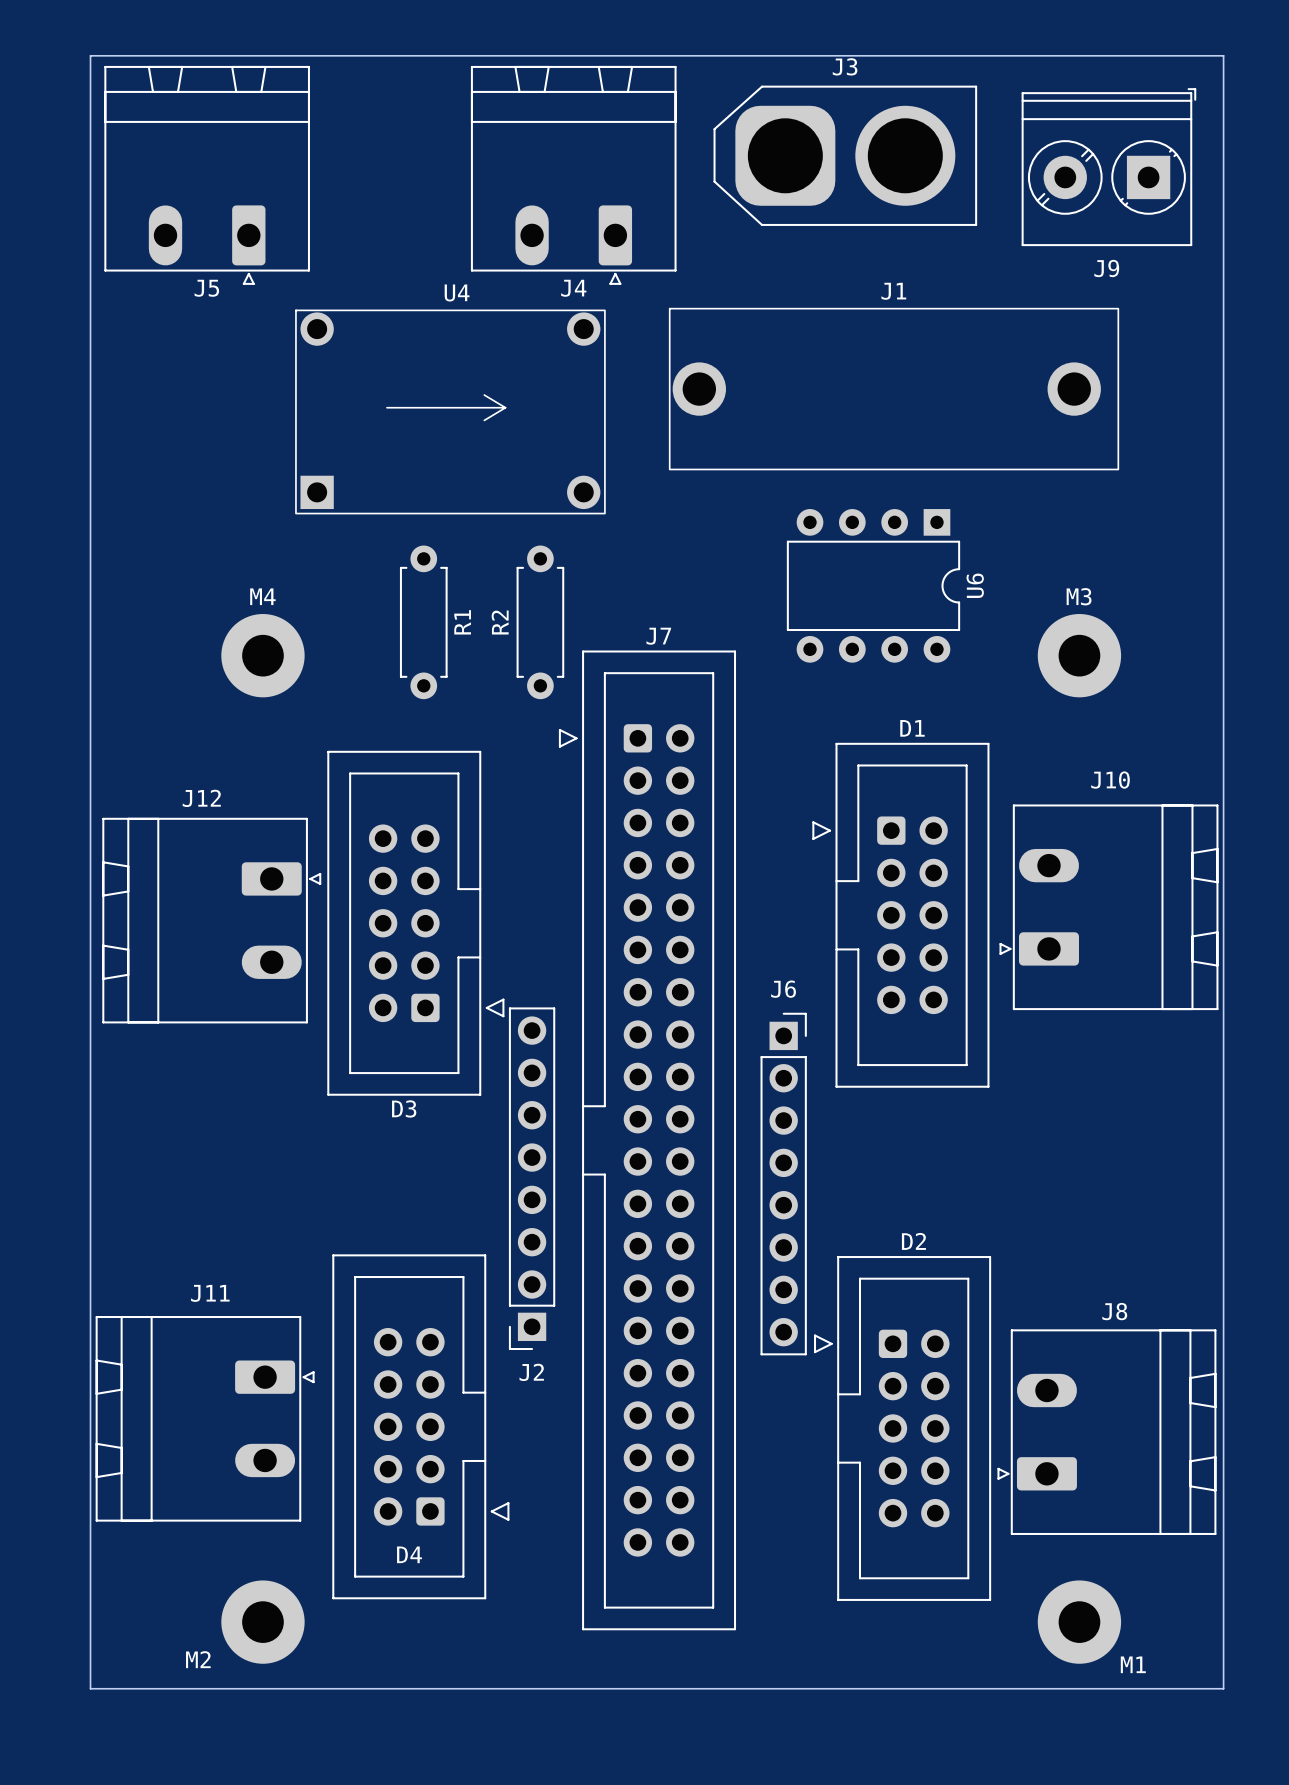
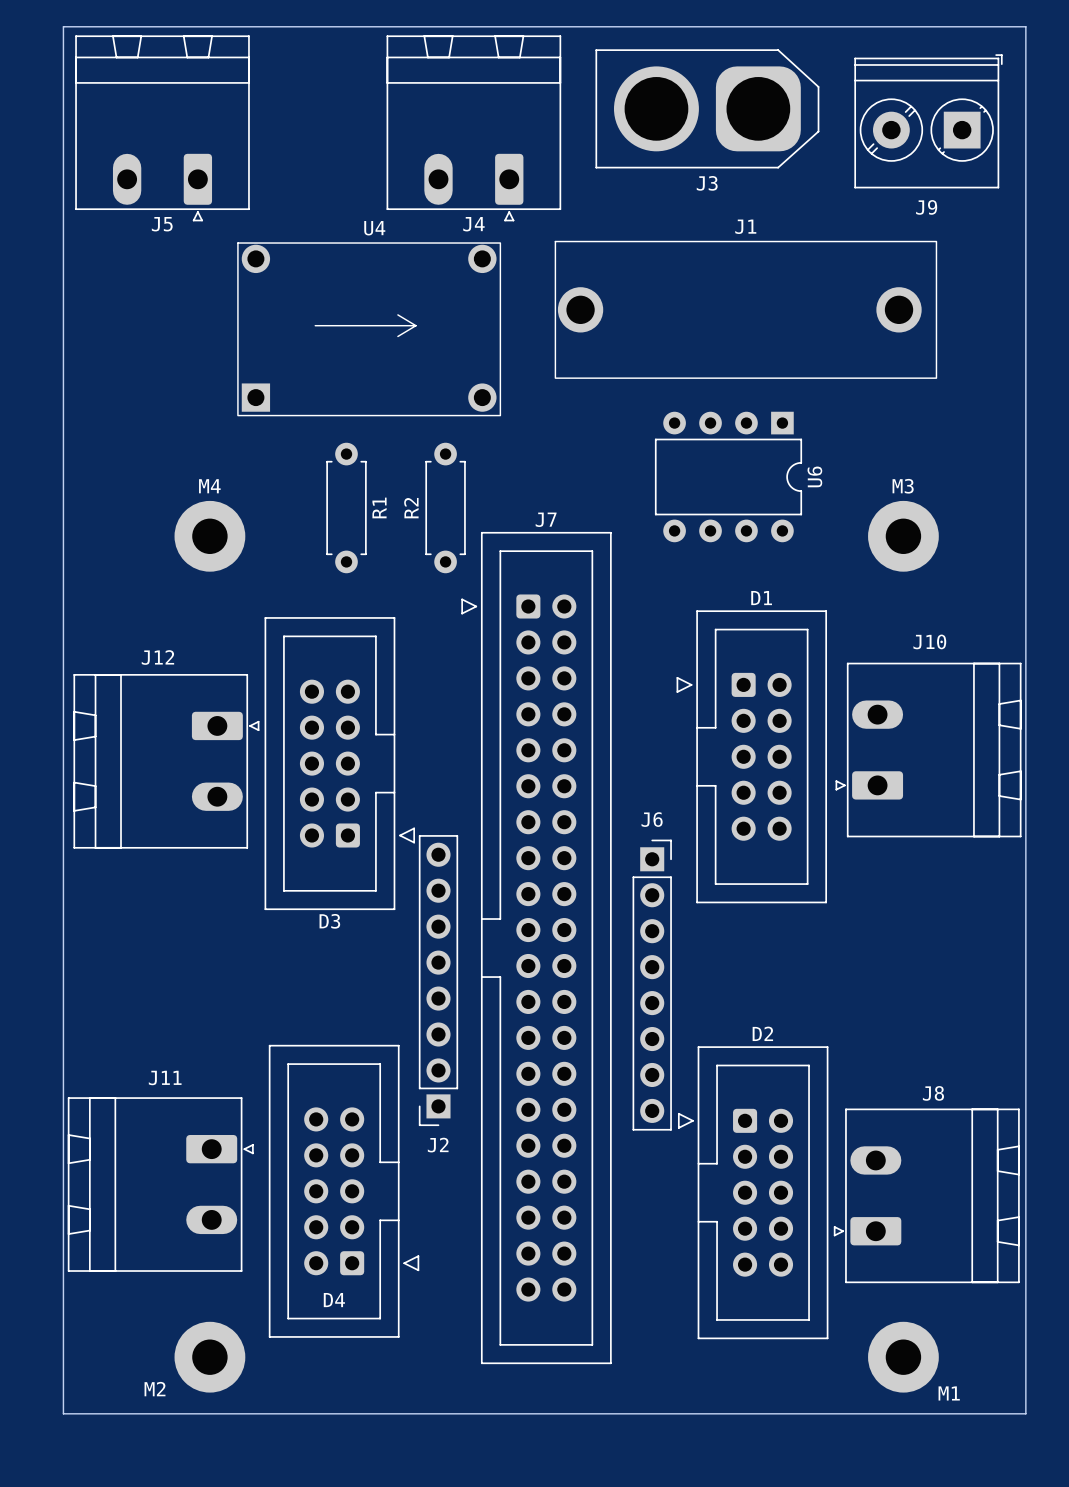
J3 rotation: 0° (845, 155) -> 180° (707, 108)

